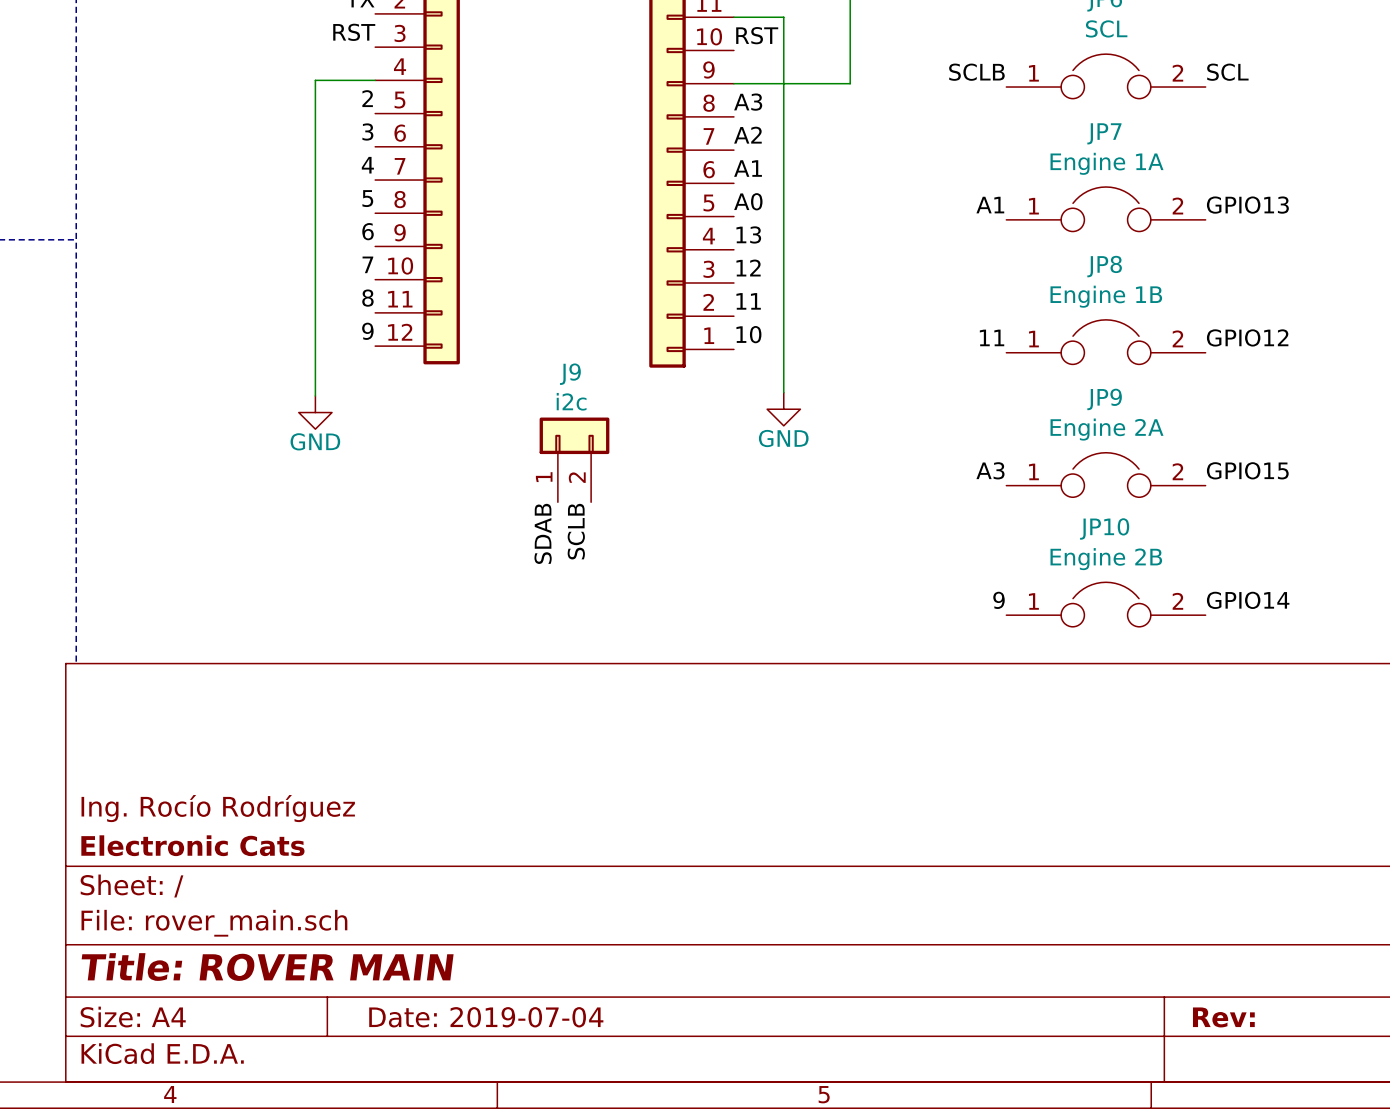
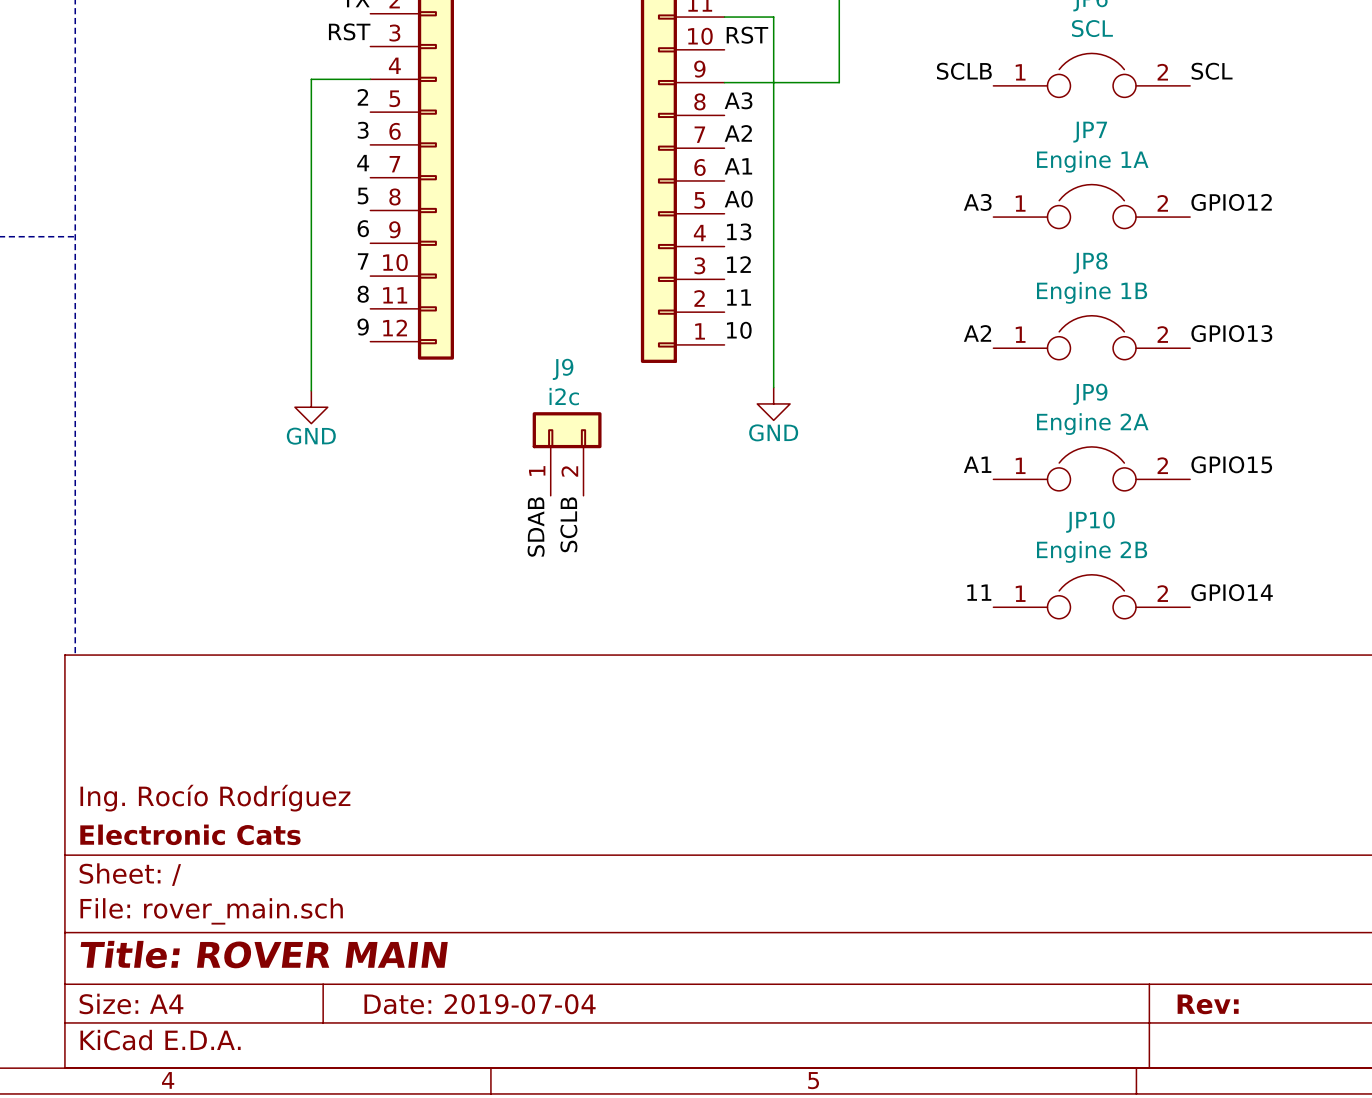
label: A1 (990, 205) -> A3 (977, 202)
label: GPIO13 (1247, 205) -> GPIO12 (1231, 202)
label: 11 (992, 337) -> A2 (977, 333)
label: GPIO12 (1247, 337) -> GPIO13 (1231, 333)
label: A3 (990, 470) -> A1 (977, 464)
label: 9 (999, 600) -> 11 (979, 592)

